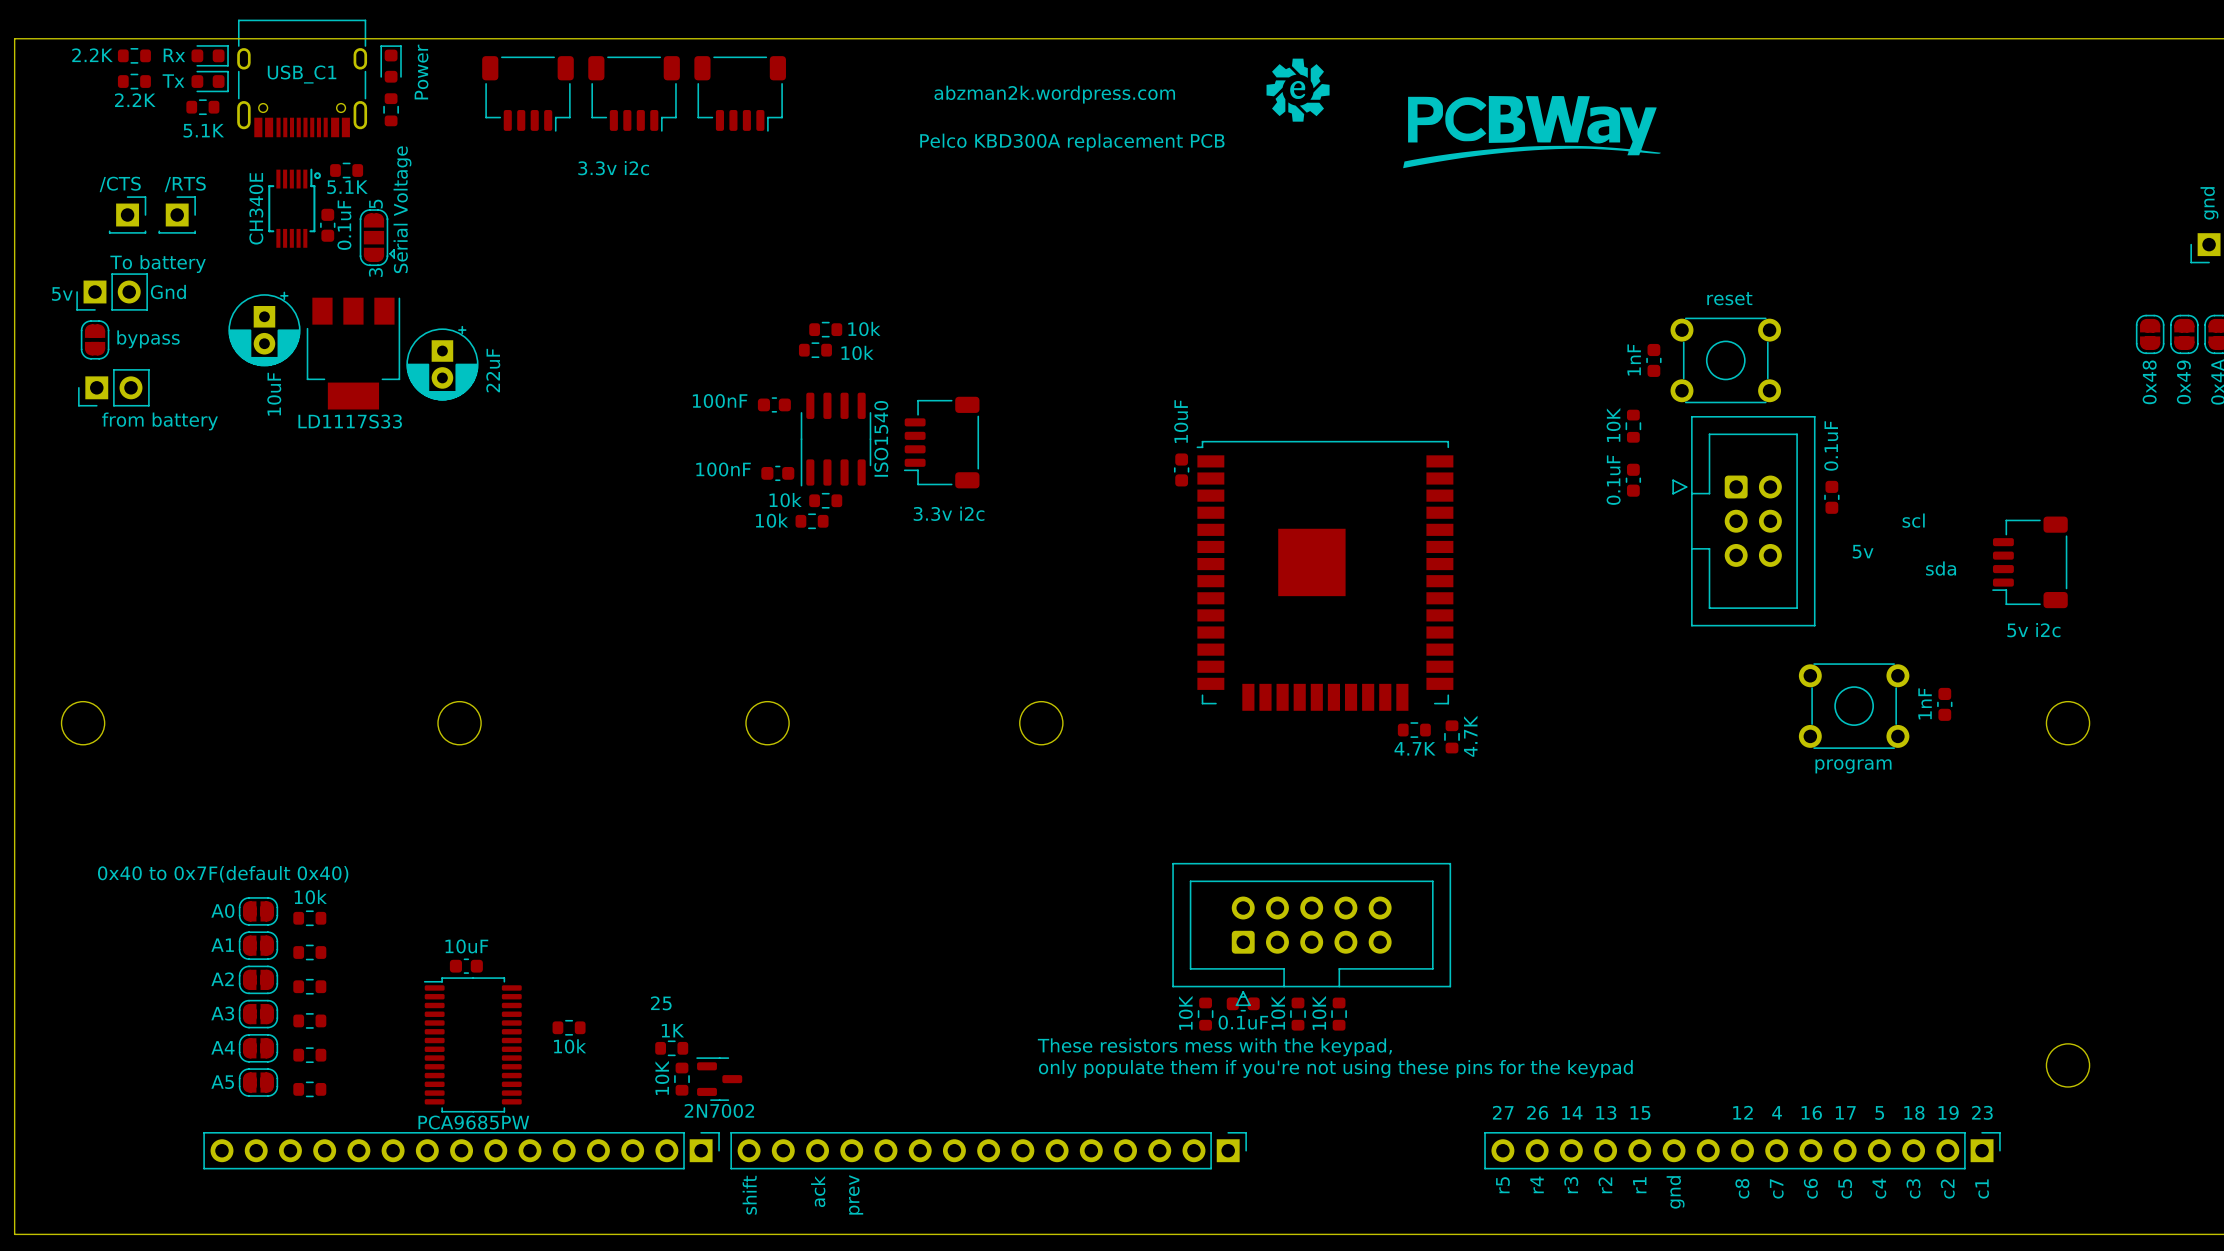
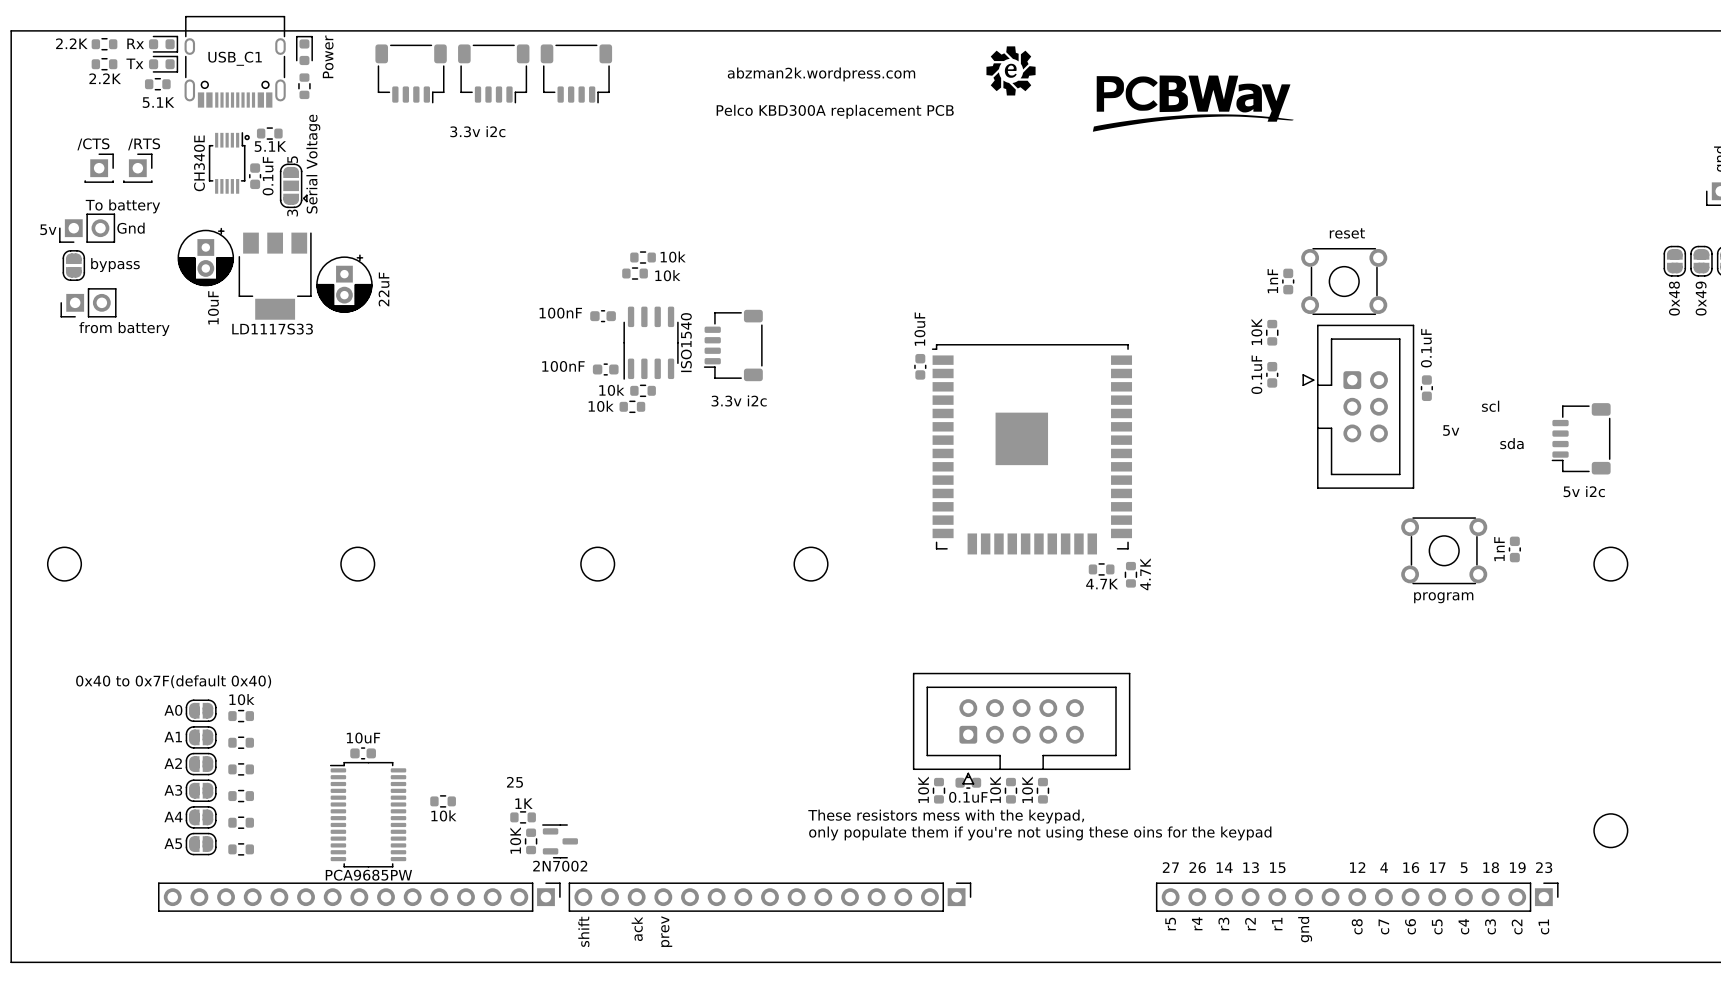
text: only populate them if you're not using these pins for the keypad (1335, 1068) -> only populate them if you're not using these oins for the keypad (1040, 833)

